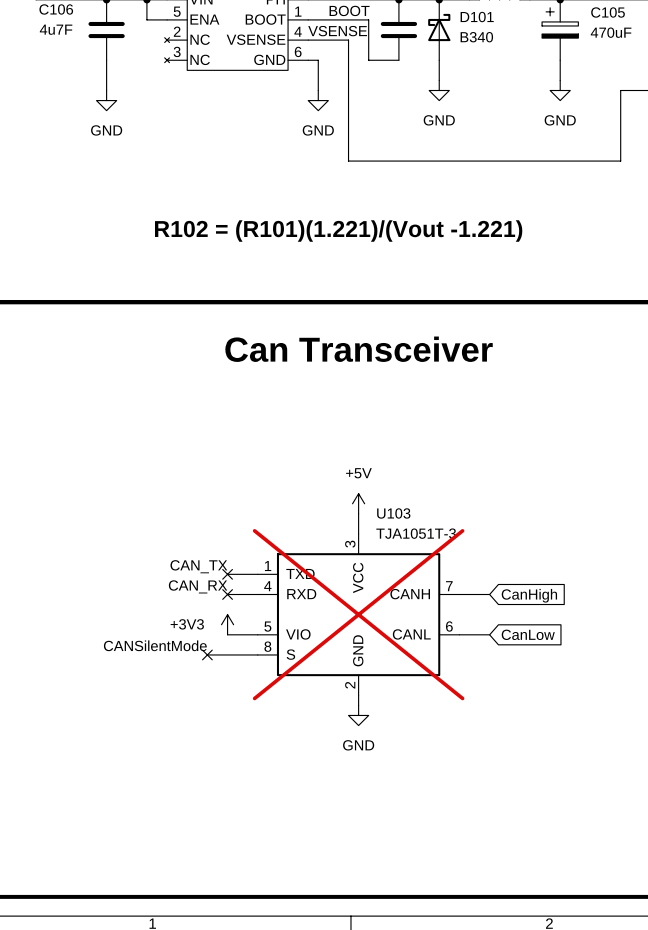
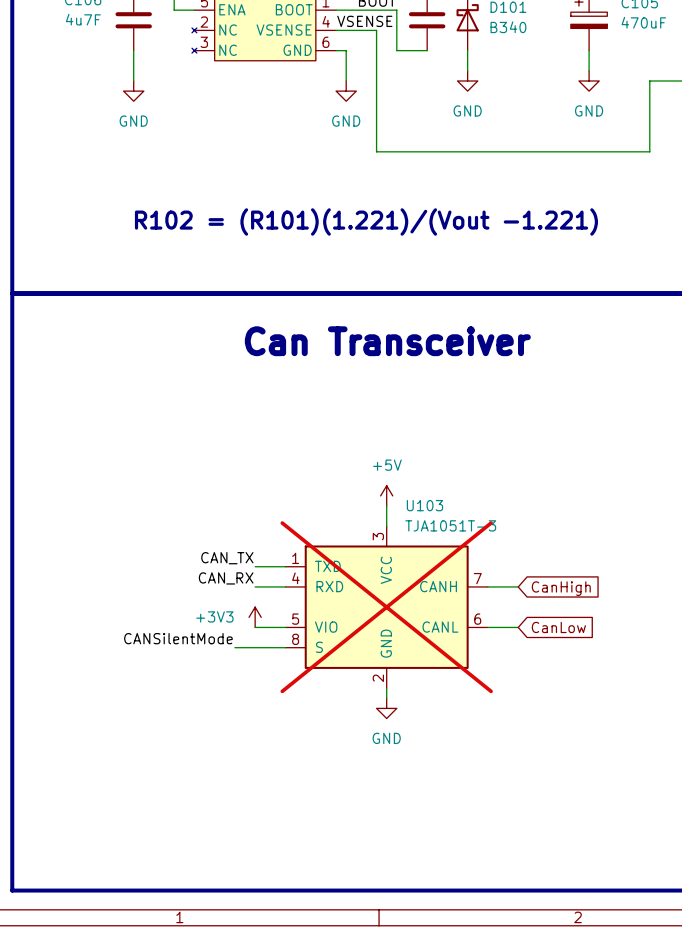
no-connect mark: (227, 574) -> none
no-connect mark: (227, 594) -> none
no-connect mark: (207, 654) -> none

